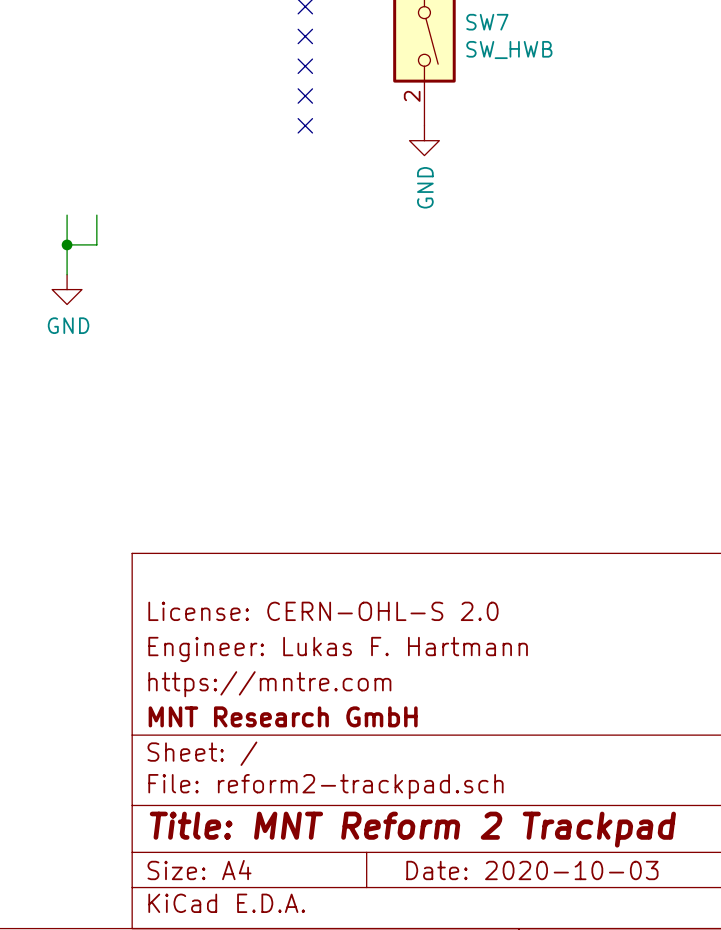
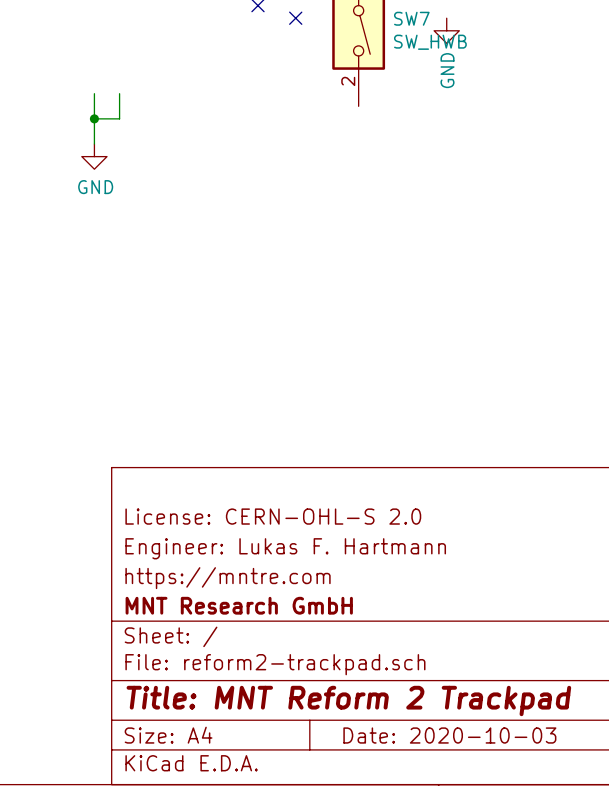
no-connect mark: none -> (295, 18)
no-connect mark: (305, 36) -> none
no-connect mark: (305, 66) -> none
no-connect mark: (305, 96) -> none
no-connect mark: (305, 125) -> none
junction: none -> (94, 118)
power symbol position: GND (424, 140) -> GND (446, 30)
wire: (67, 215) (67, 274) -> (94, 93) (94, 144)
wire: (96, 215) (96, 244) (67, 244) -> (119, 93) (119, 118) (94, 118)
junction: (67, 244) -> none
power symbol position: GND (67, 289) -> GND (94, 156)

